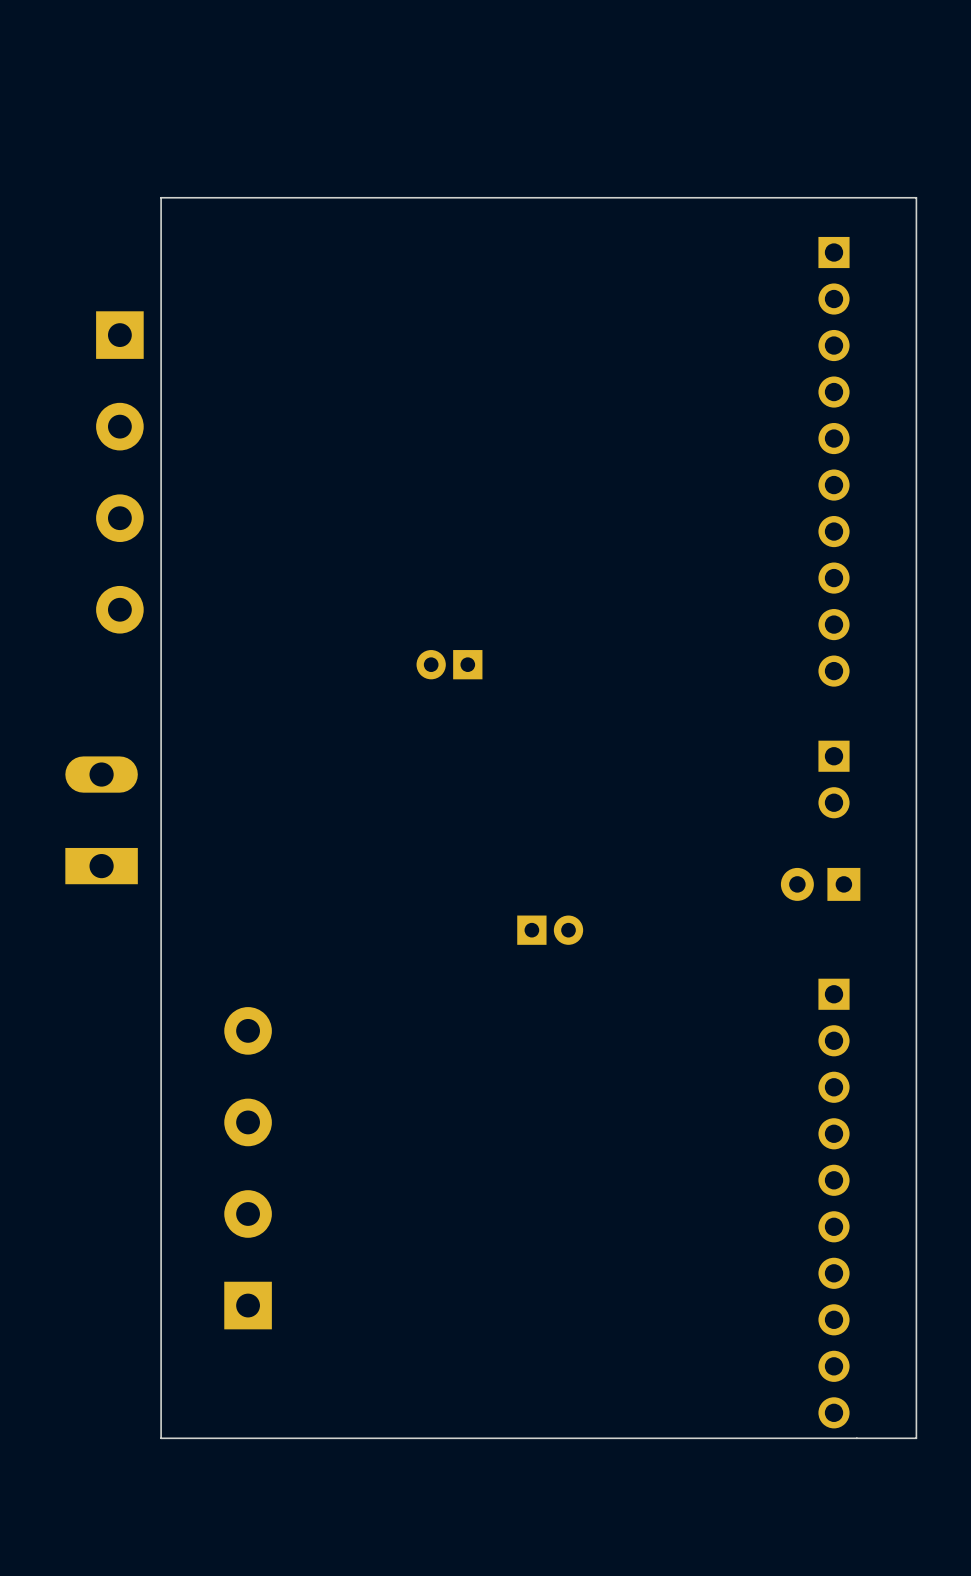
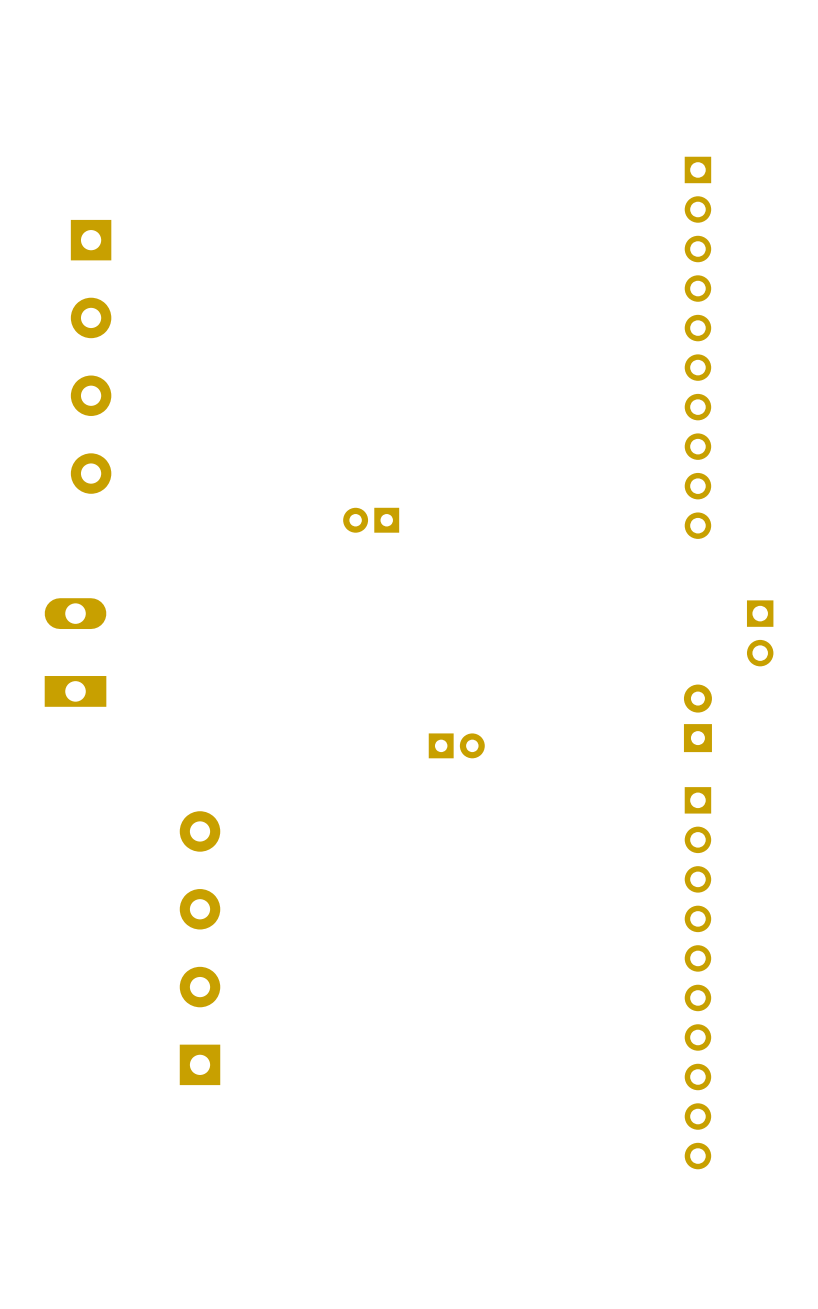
board edge: (916, 197) (916, 1438) (161, 1438) (161, 197) (916, 197) -> none
part position: (834, 779) -> (760, 633)
part rotation: 0° (820, 884) -> 90° clockwise (697, 718)

